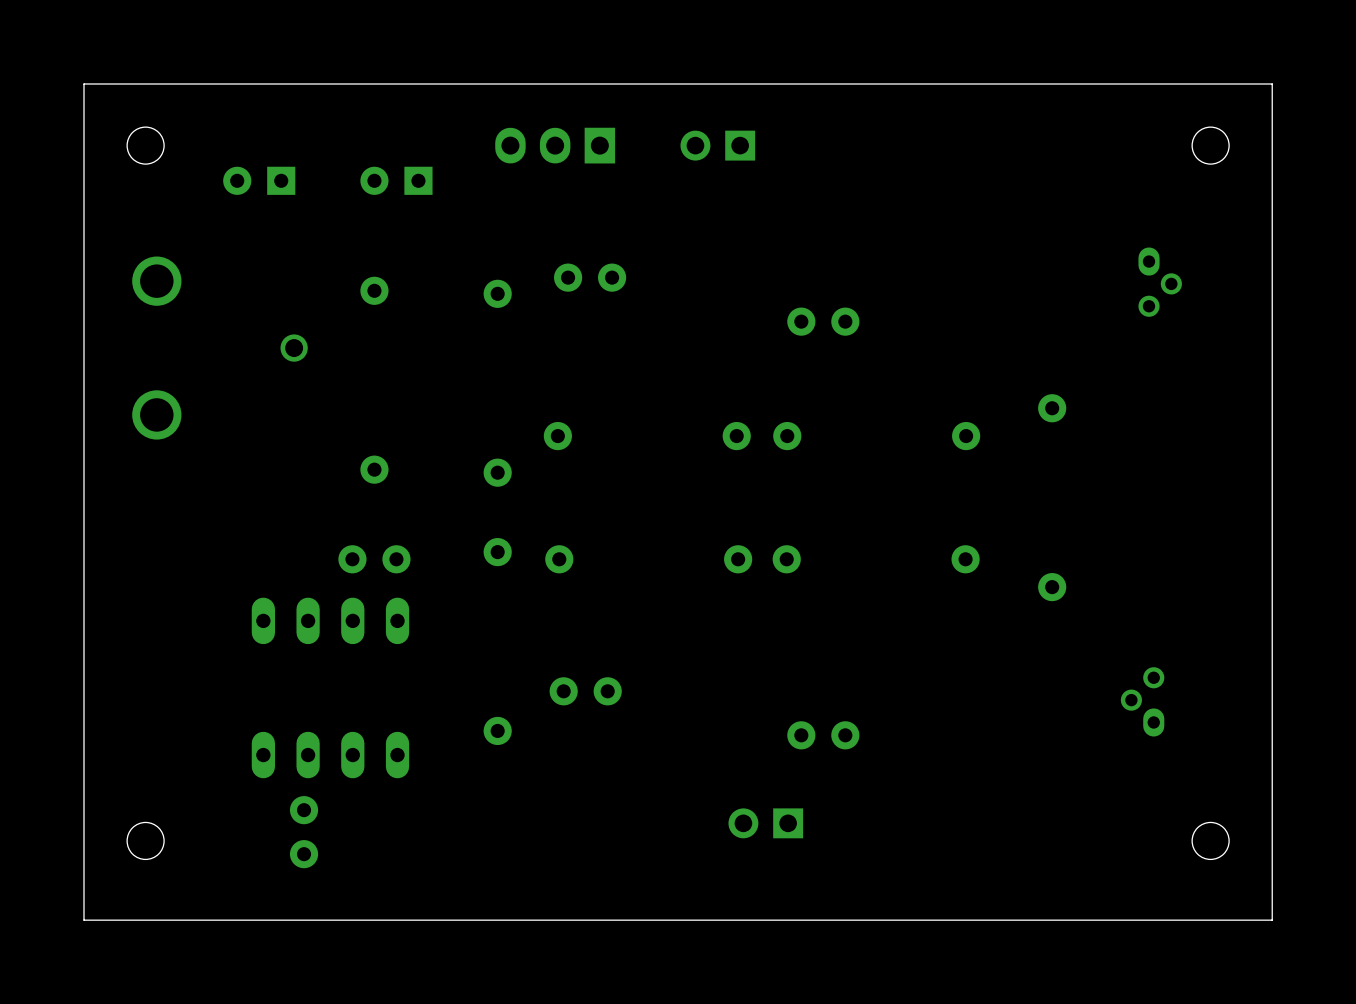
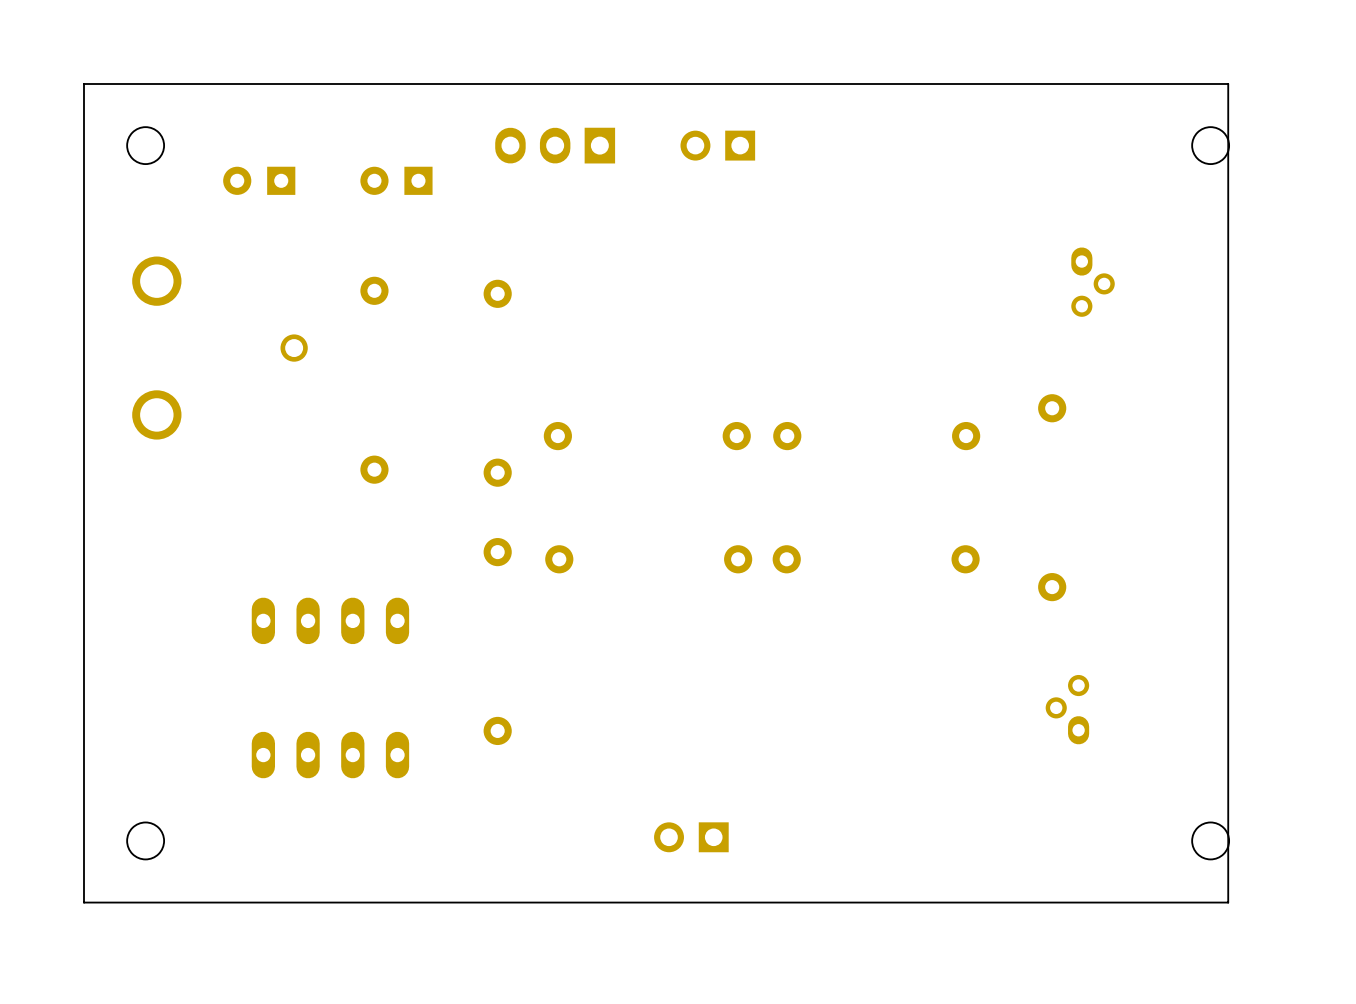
board edge: (1228, 83) (1272, 83) (1272, 920) (83, 920) (83, 902) -> (1228, 83) (1228, 902) (83, 902)
part: (590, 277) -> none
part position: (1160, 282) -> (1093, 282)
part: (823, 321) -> none
part: (374, 559) -> none
part: (585, 691) -> none
part position: (1142, 701) -> (1067, 709)
part: (823, 735) -> none
part position: (765, 823) -> (691, 837)
part: (304, 832) -> none

